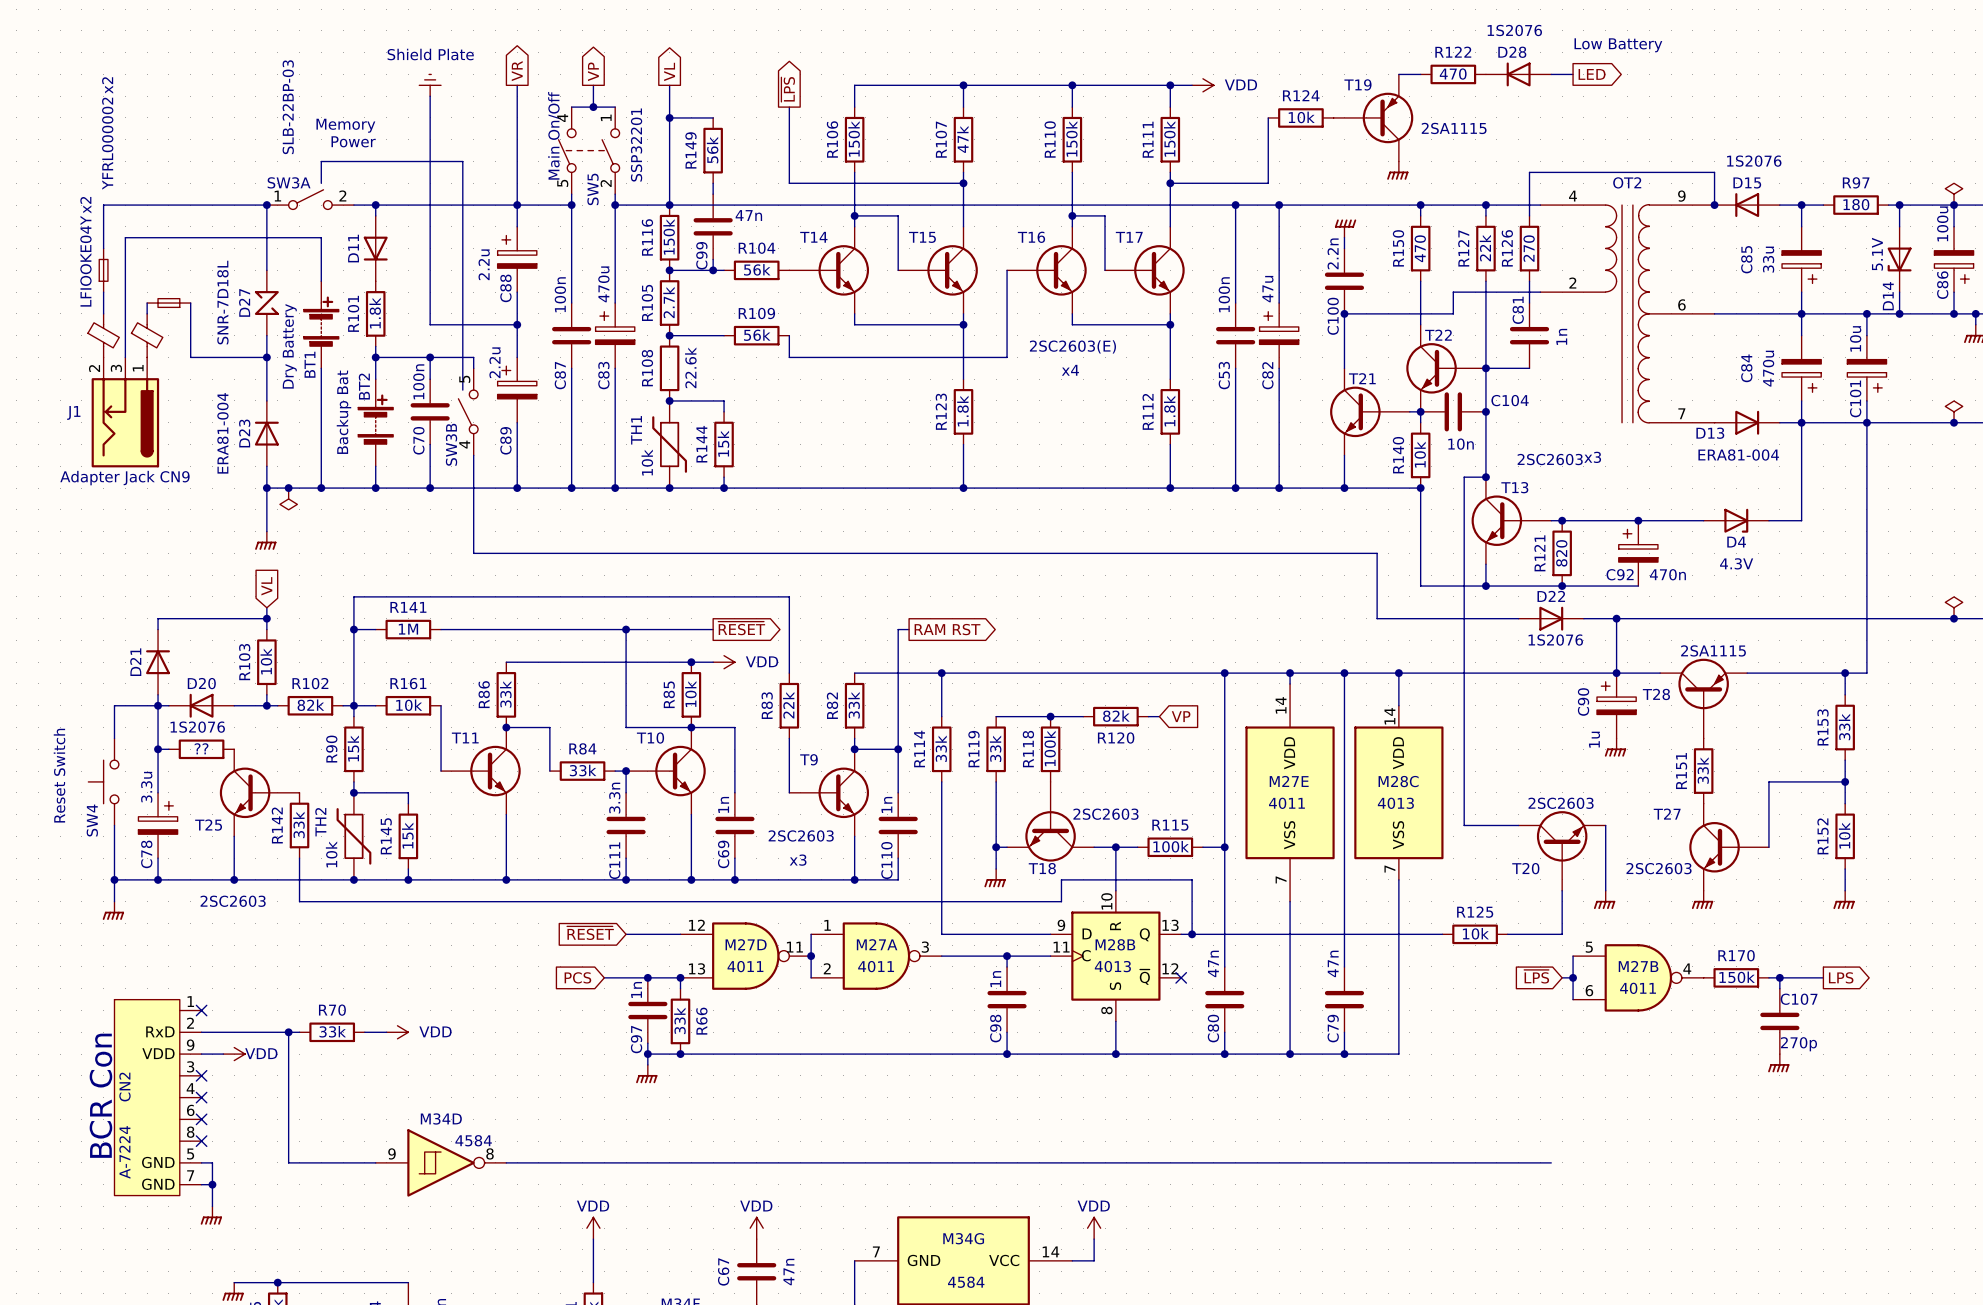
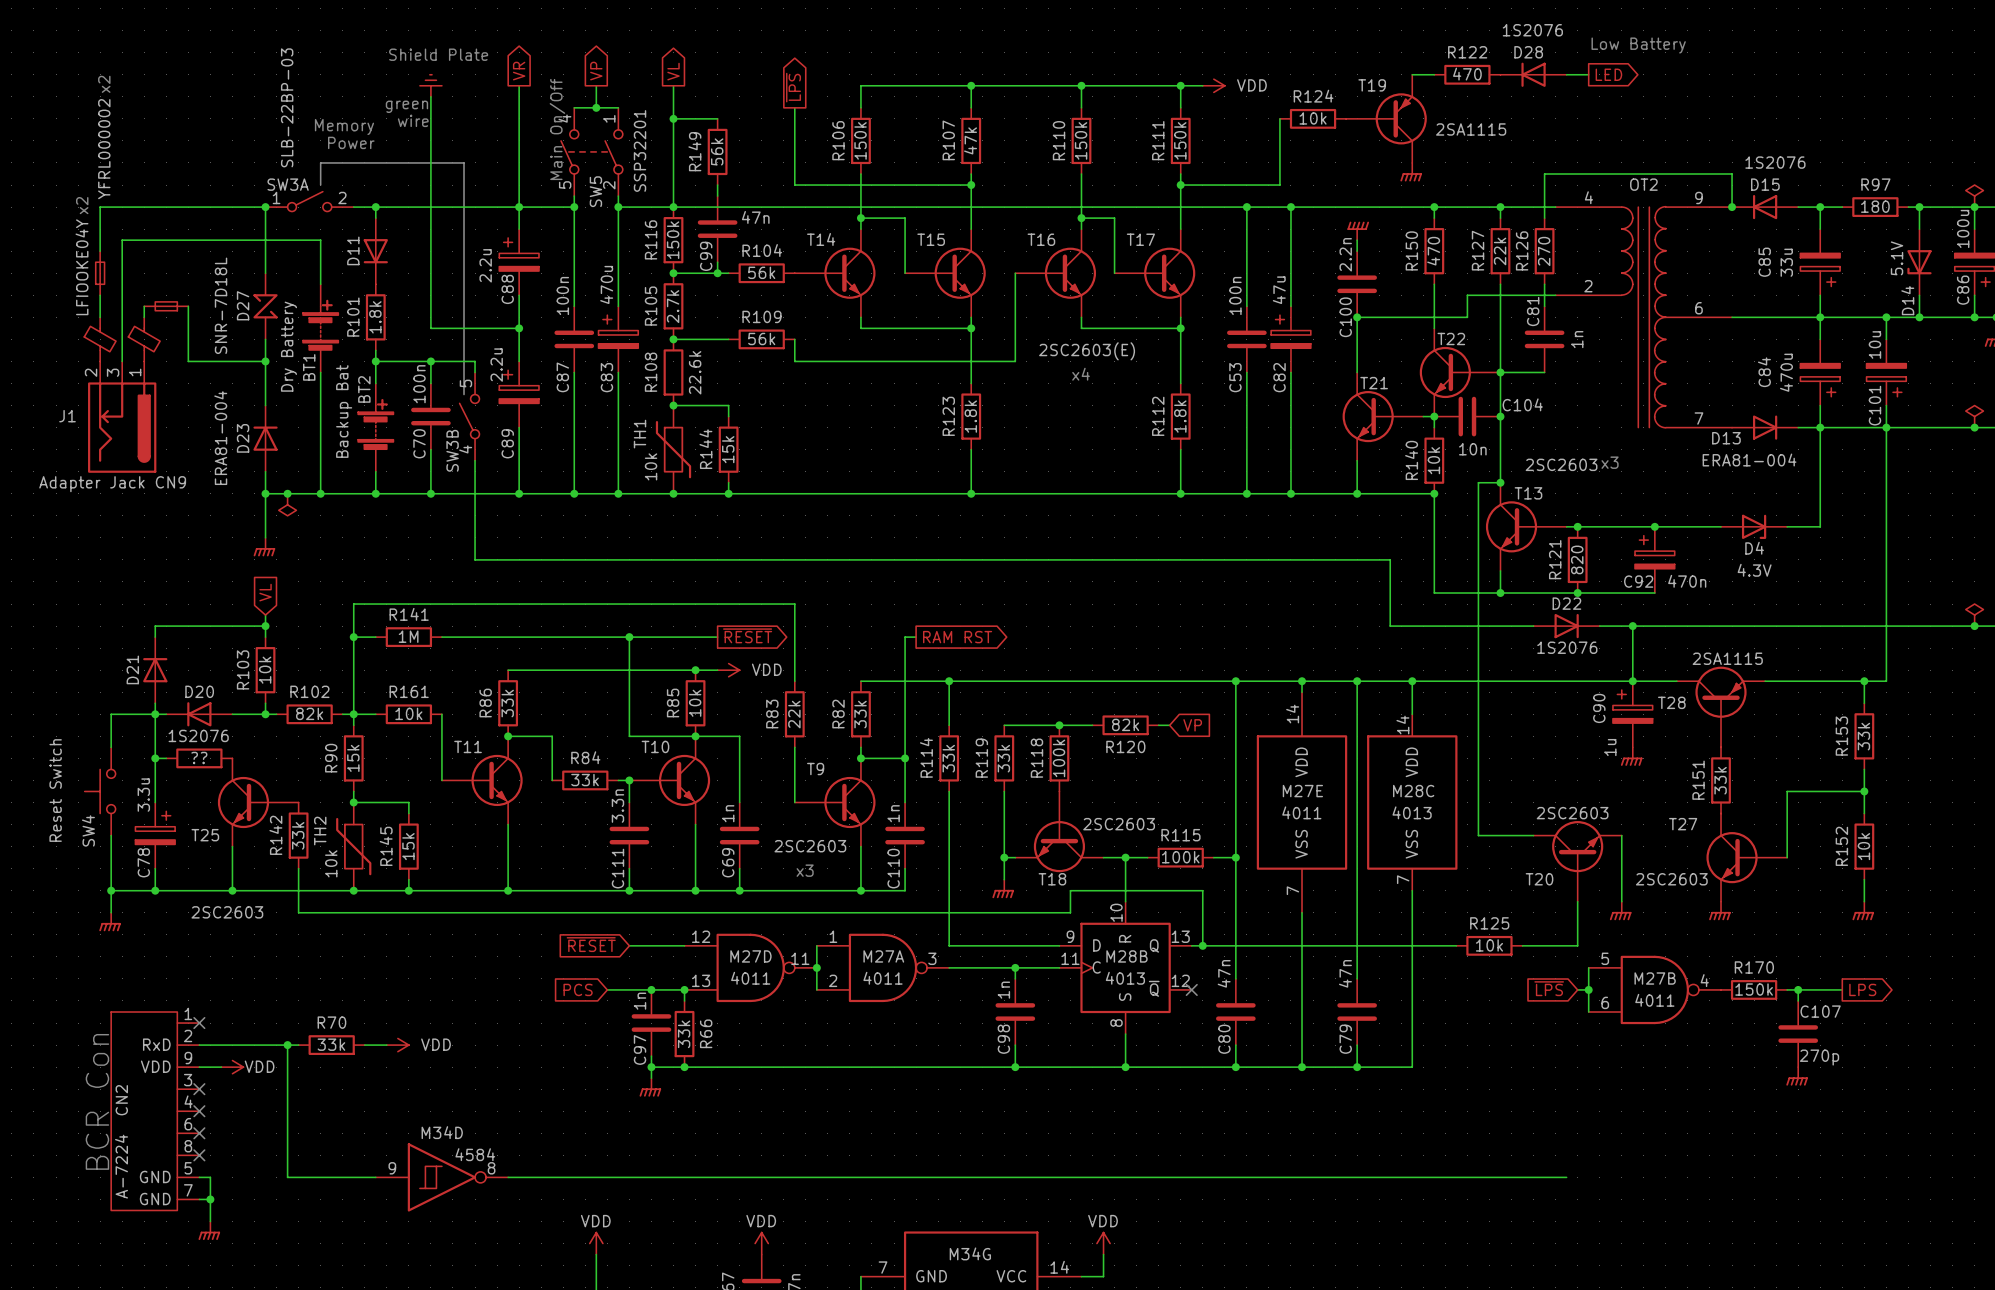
text: none -> green (406, 106)
text: none -> wire (413, 120)

